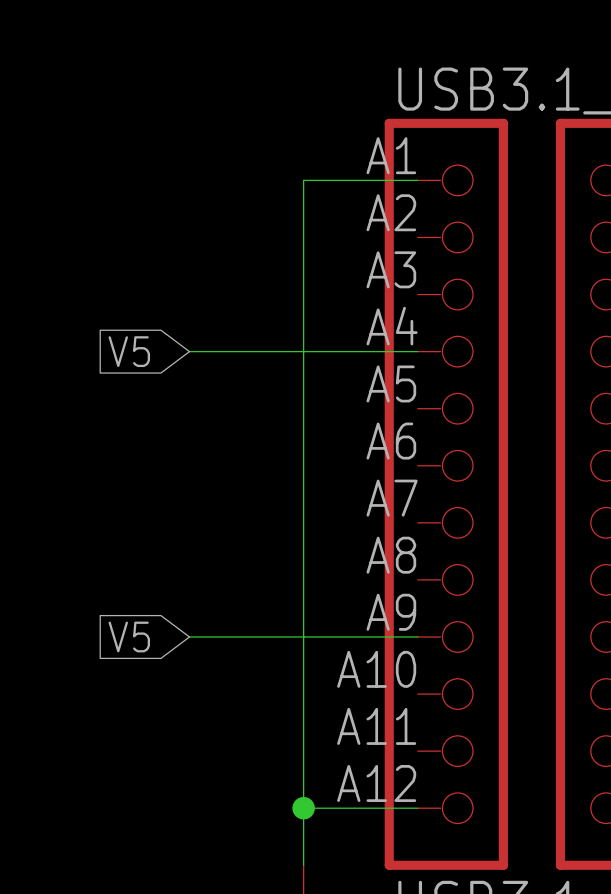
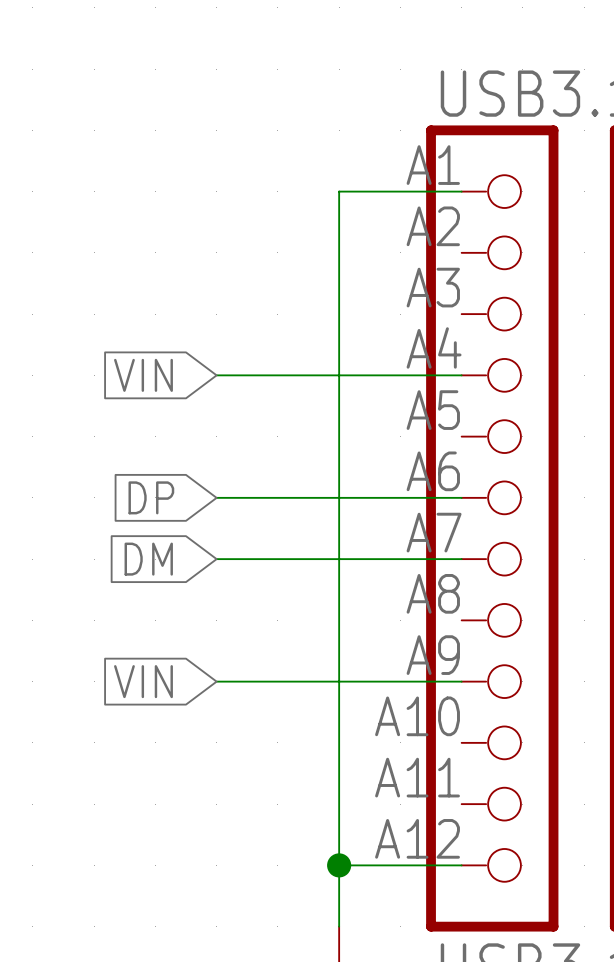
global label: V5 (129, 351) -> VIN (143, 375)
global label: none -> DP (151, 497)
wire: none -> (216, 497) (461, 497)
global label: none -> DM (148, 559)
wire: none -> (216, 559) (461, 559)
global label: V5 (129, 636) -> VIN (143, 681)

